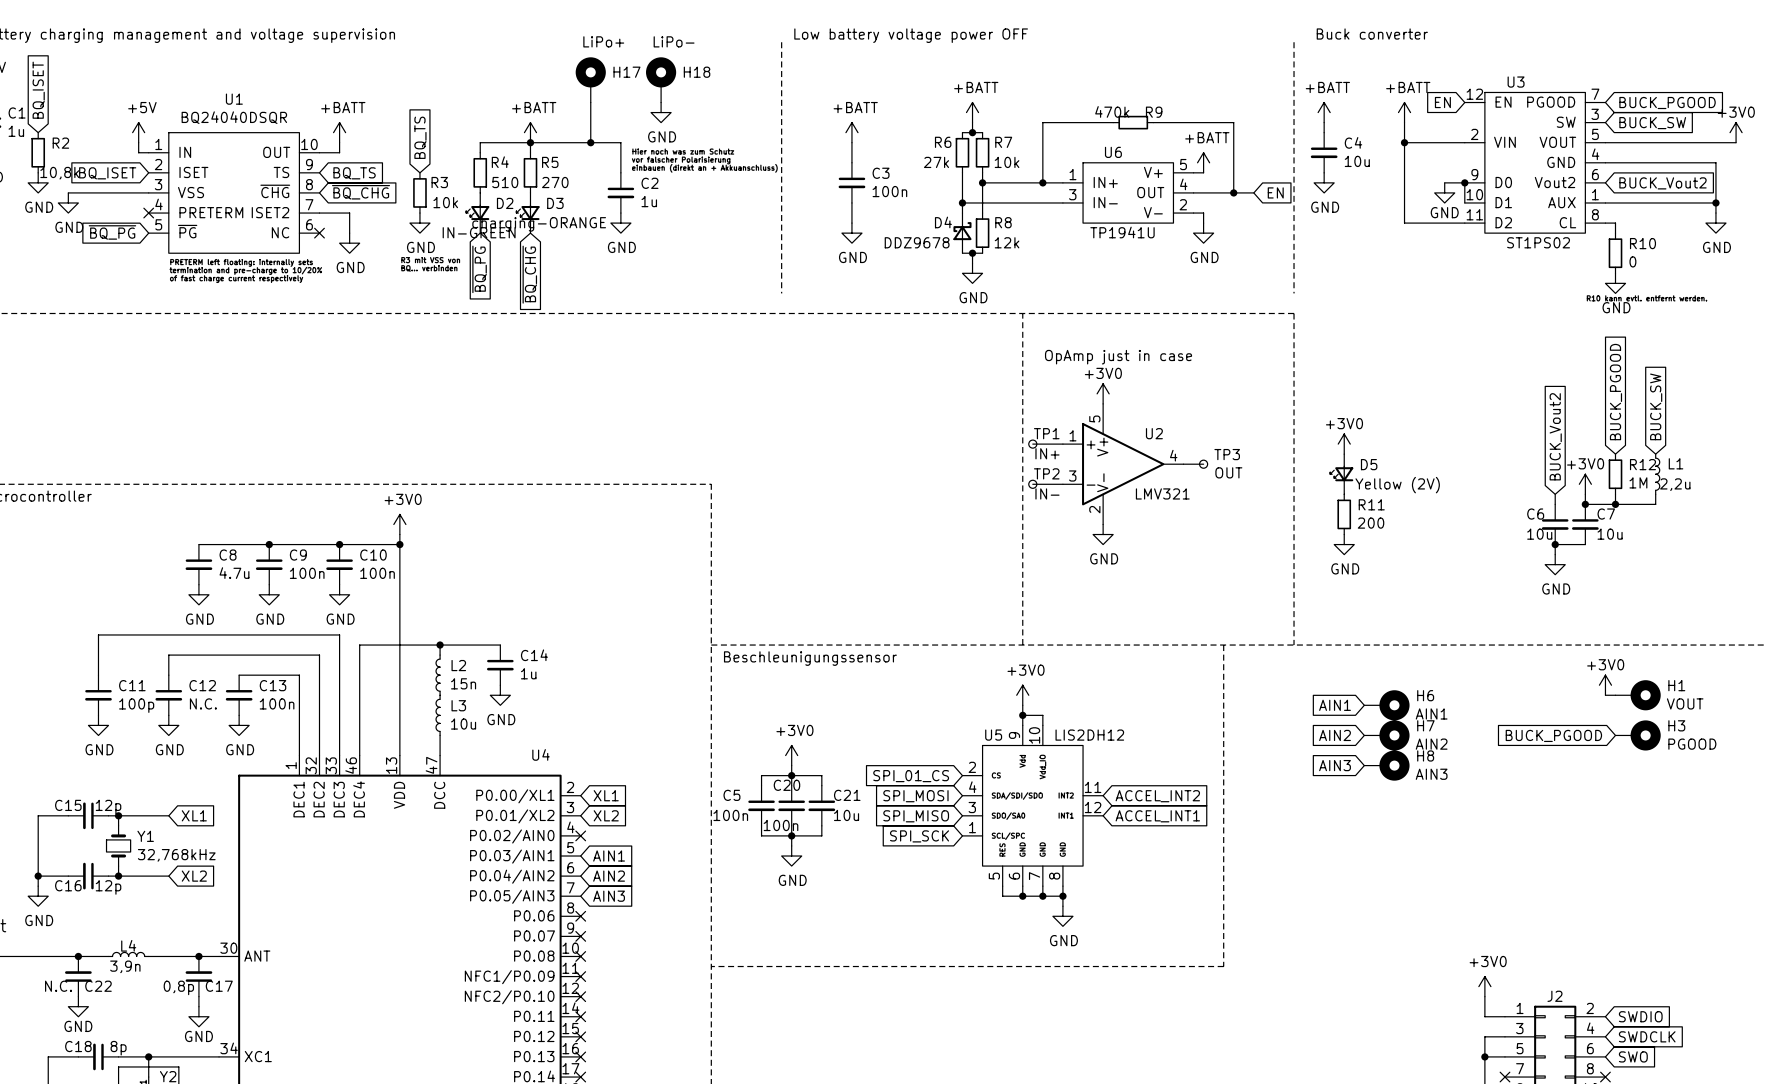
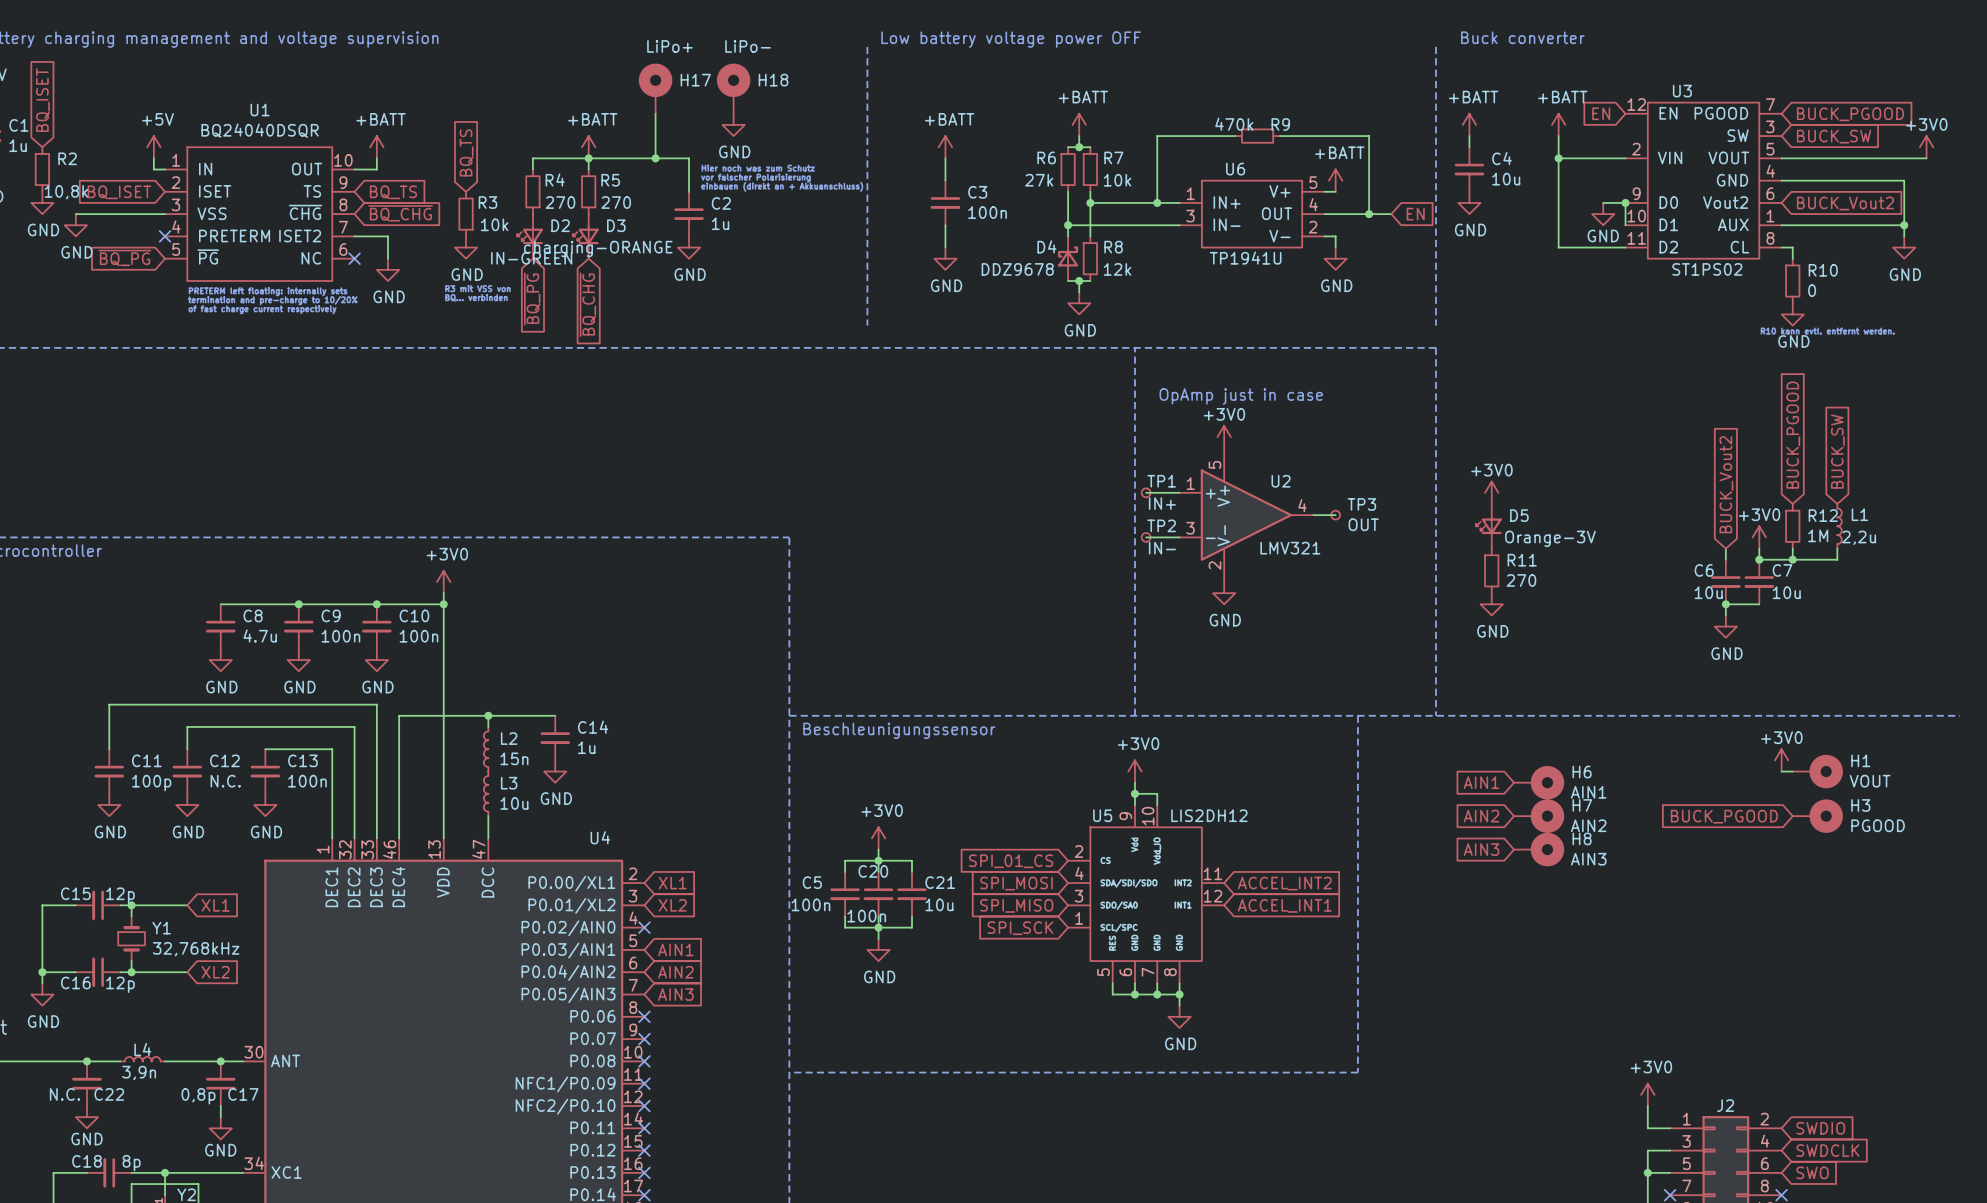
R4 value: 510 (505, 182) -> 270 (560, 202)
D5 value: Yellow (2V) (1397, 485) -> Orange-3V (1550, 538)
R11 value: 200 (1371, 523) -> 270 (1521, 580)

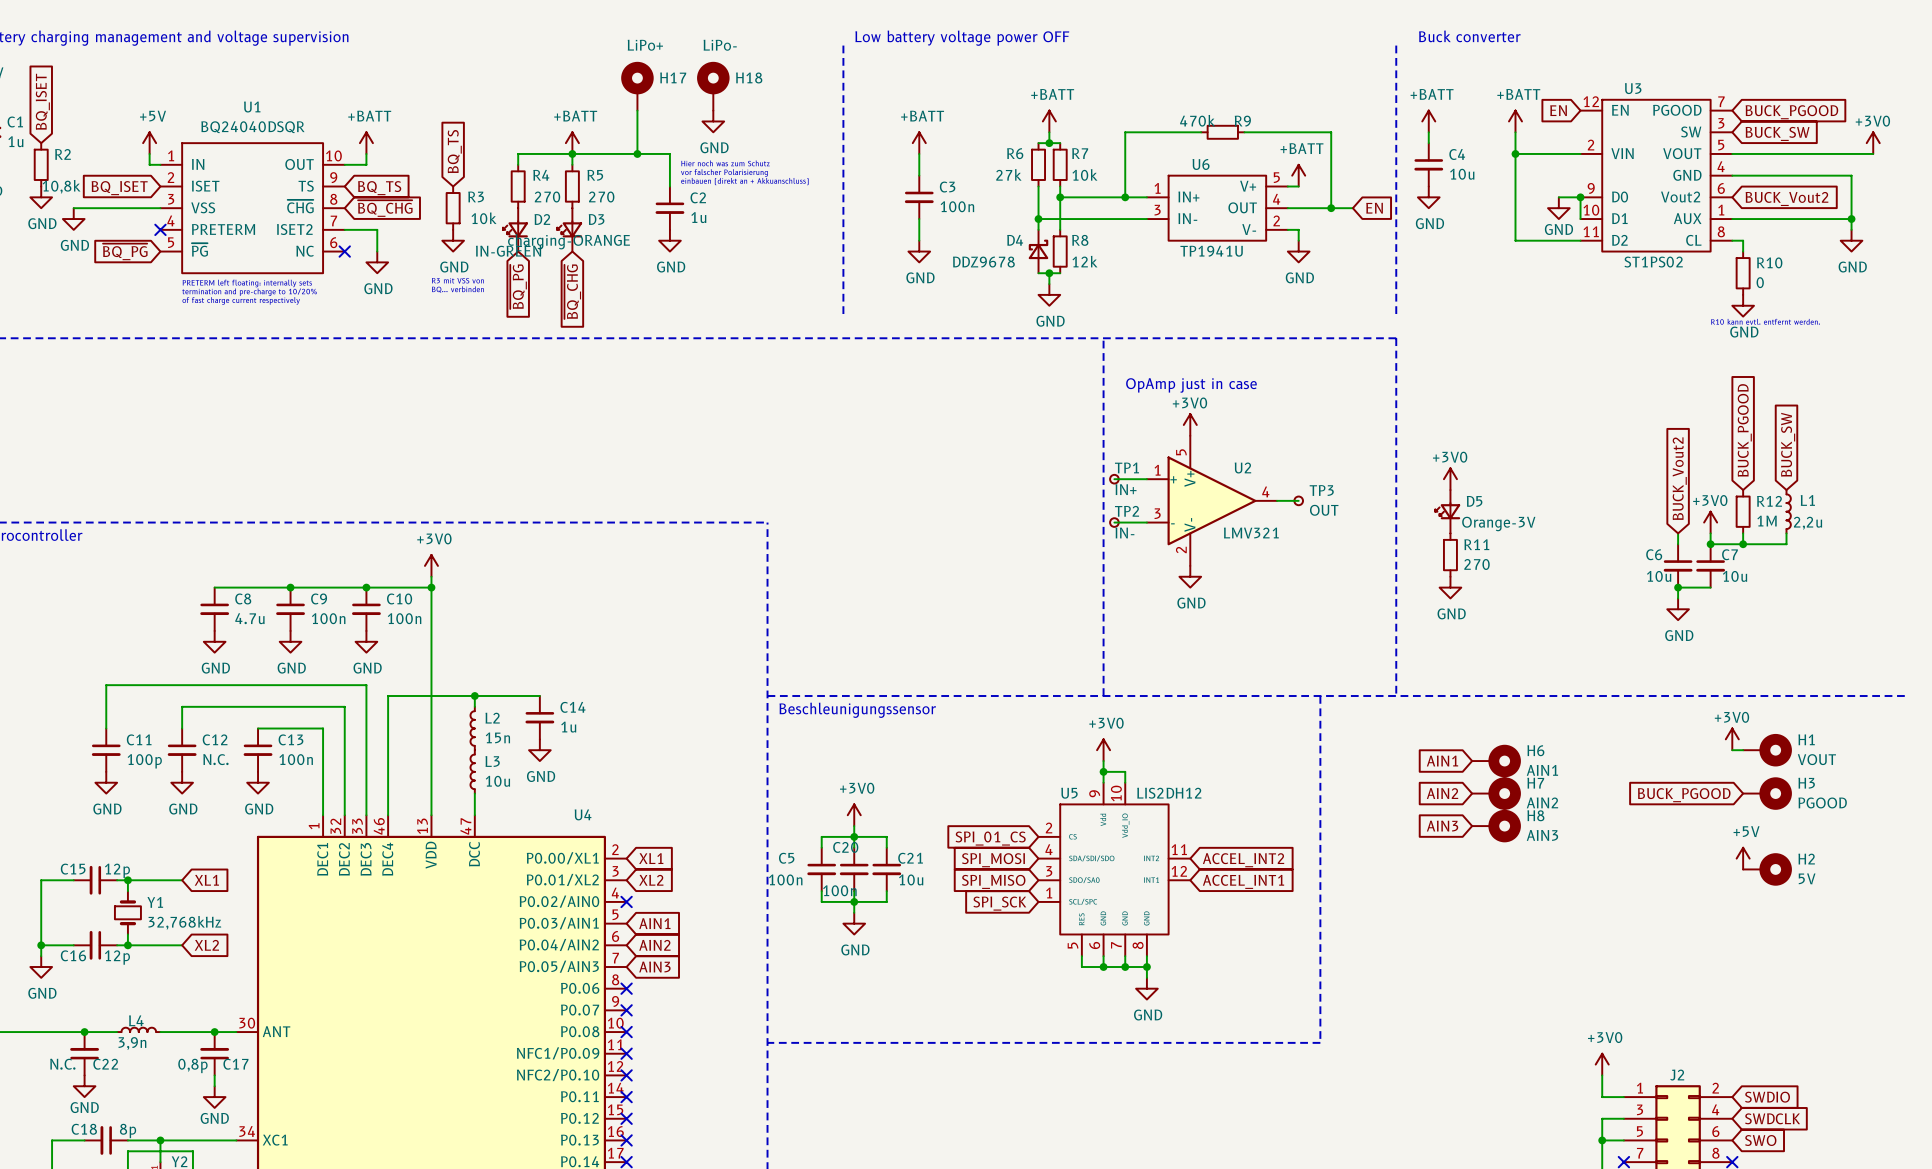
power symbol: none -> +5V (1743, 858)
H2: none -> 5V (1767, 869)

